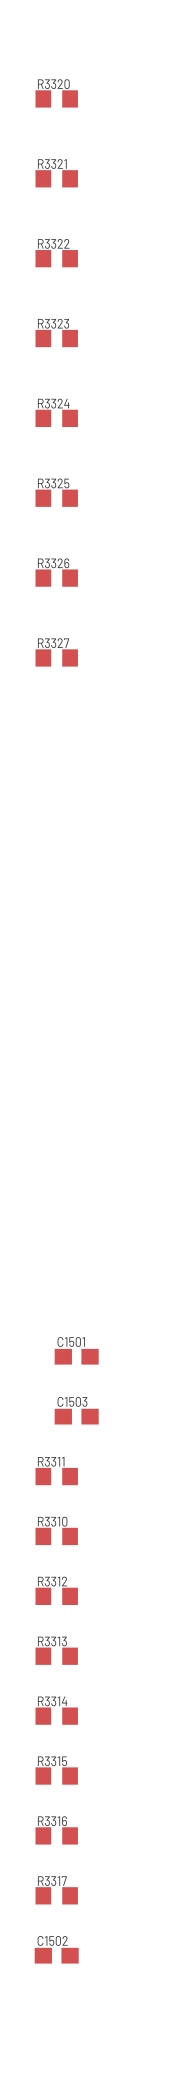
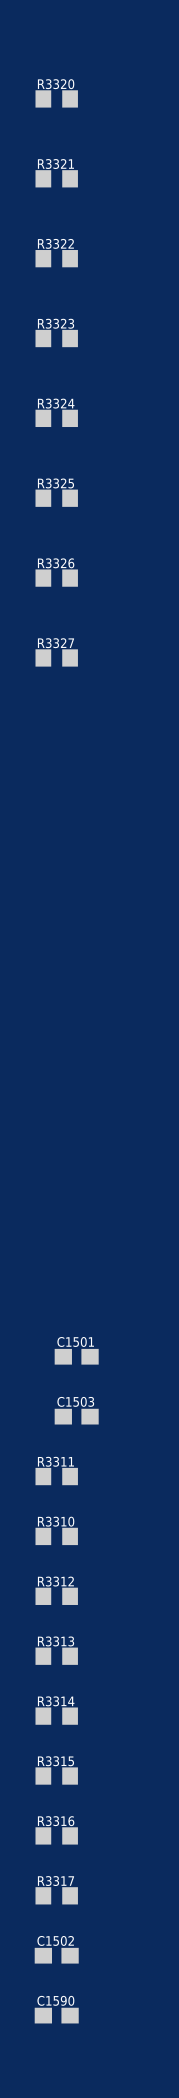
C1590: none -> (56, 2015)

